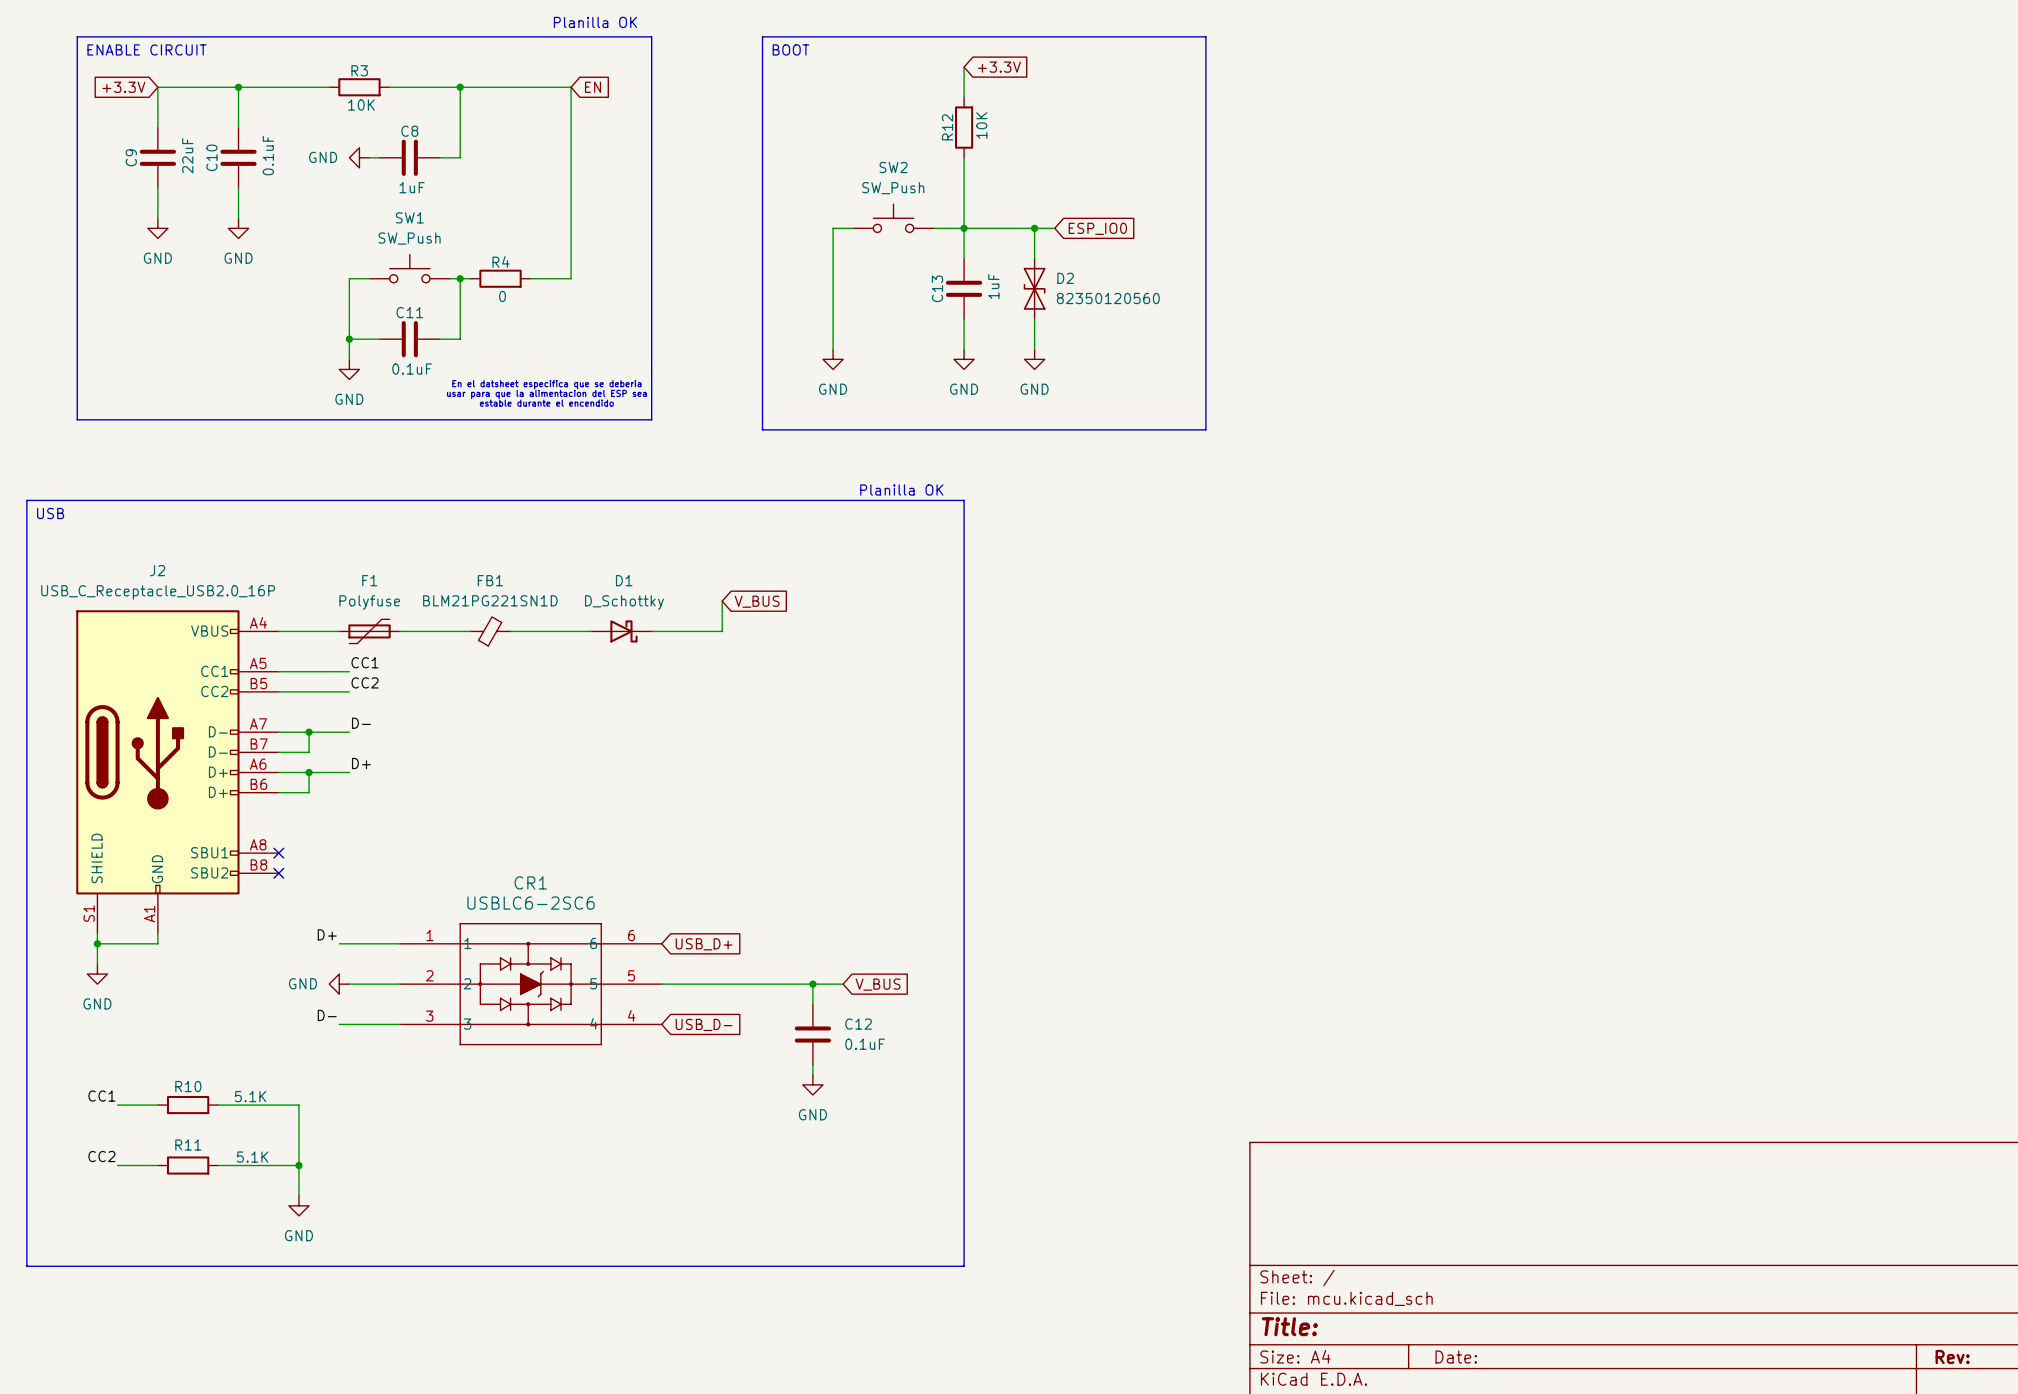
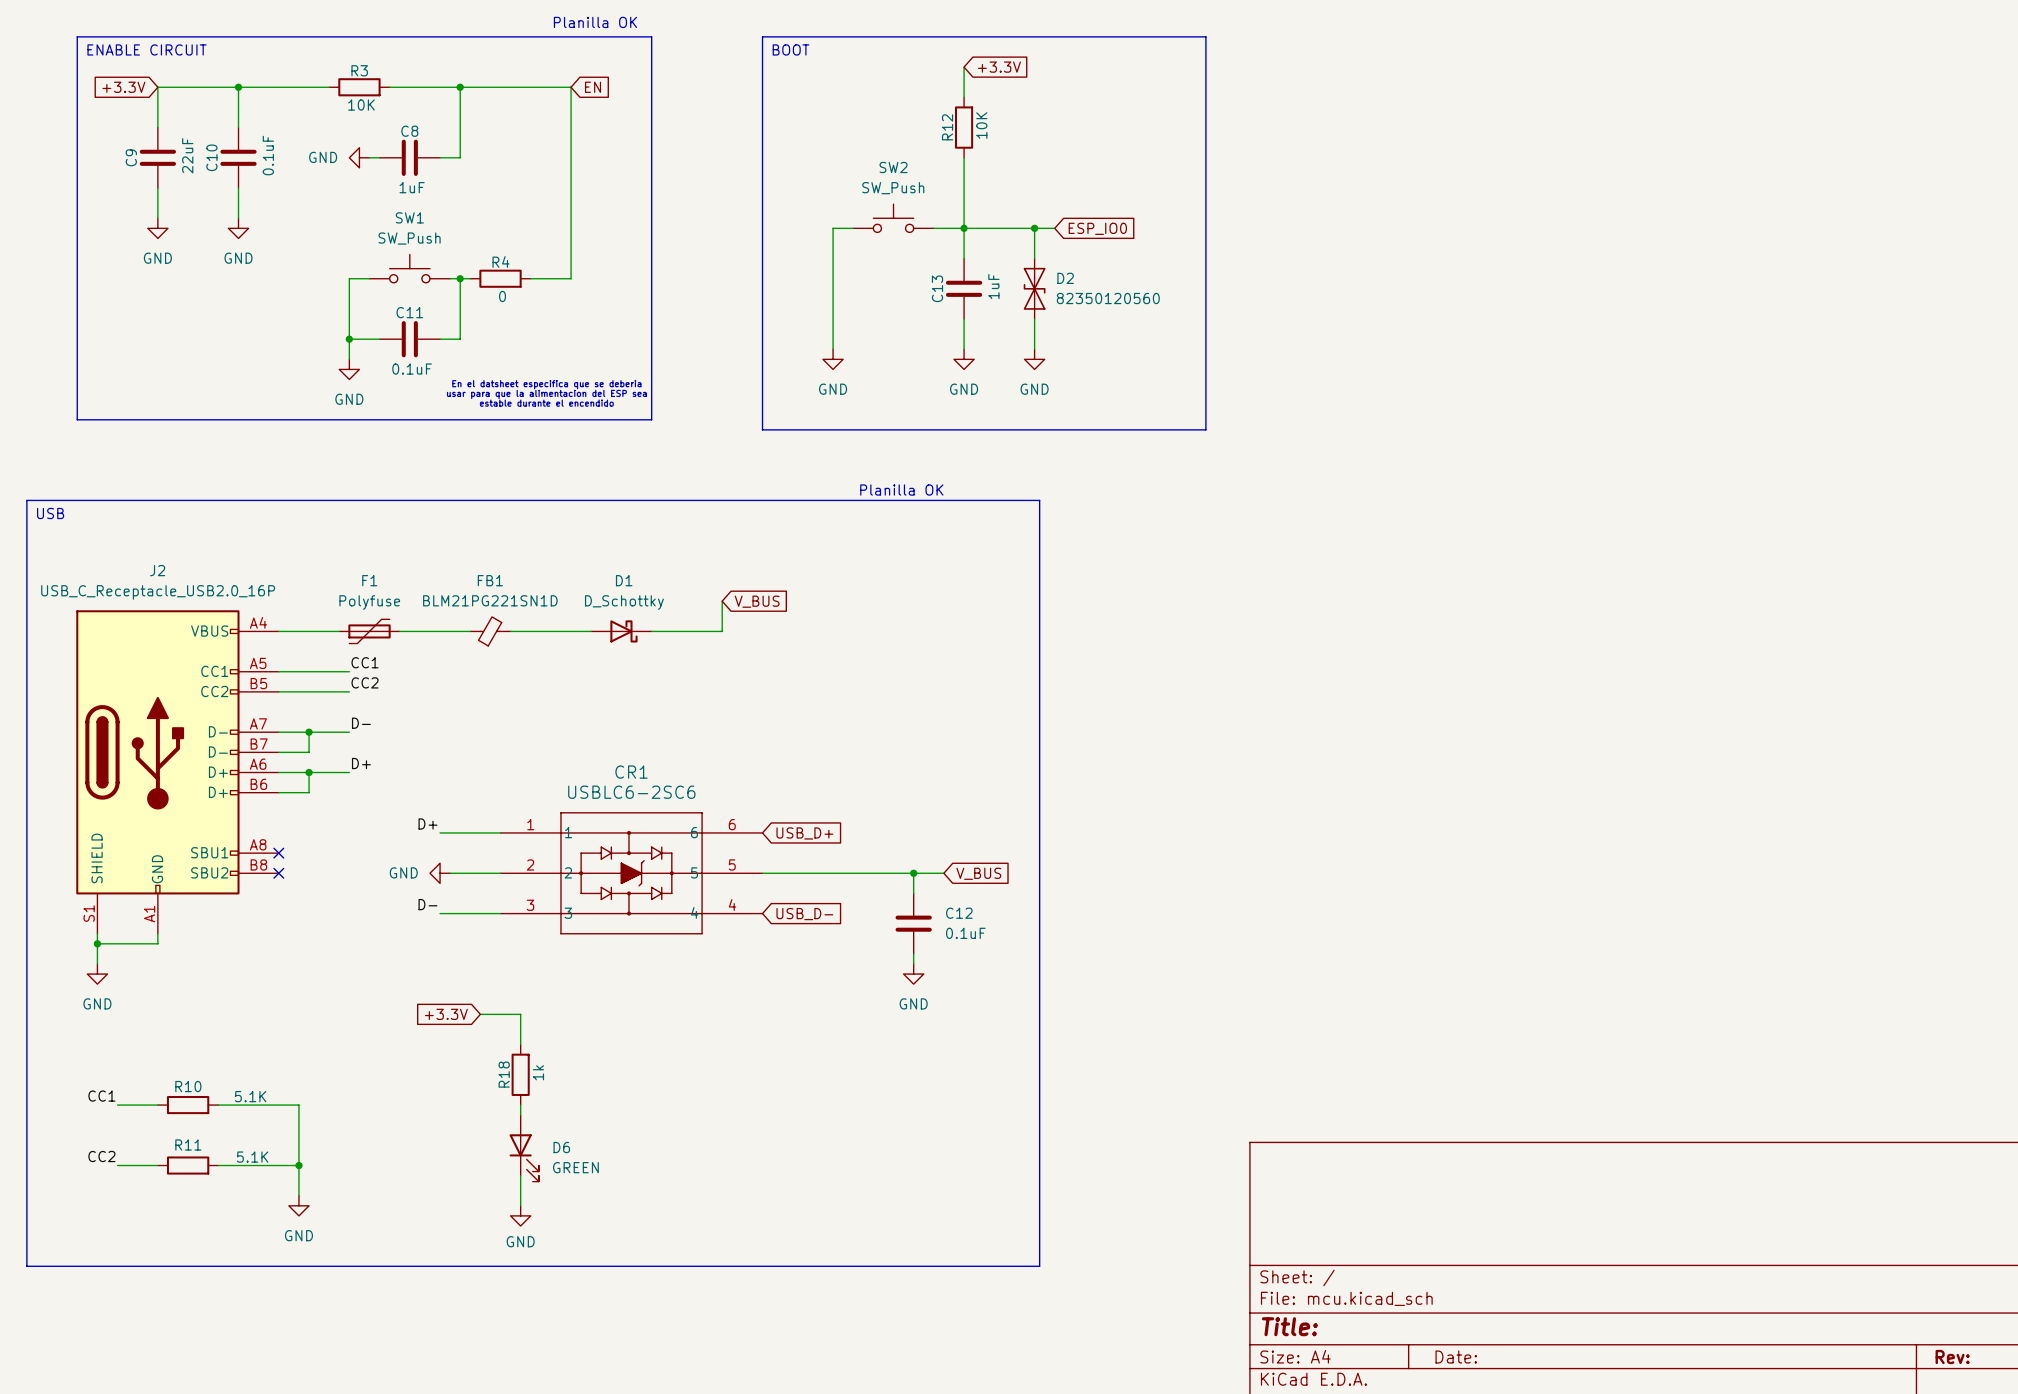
line: (964, 500) (964, 1266) -> (964, 500) (1039, 500) (1039, 1266) (964, 1266)
power symbol: none -> GND (440, 873)
junction: none -> (913, 873)
label position: D+ (327, 934) -> D+ (427, 823)
wire: (339, 943) (399, 943) -> (440, 832) (500, 832)
global label position: USB_D+ (704, 944) -> USB_D+ (804, 833)
power symbol: GND (339, 984) -> none
wire: (349, 984) (399, 984) -> (450, 873) (500, 873)
CR1 position: (530, 984) -> (631, 873)
wire: (661, 984) (843, 984) -> (762, 873) (943, 873)
wire: (812, 984) (812, 1004) -> (913, 873) (913, 893)
junction: (812, 984) -> none
global label position: V_BUS (878, 984) -> V_BUS (978, 873)
global label: none -> +3.3V (446, 1014)
wire: none -> (480, 1014) (520, 1014) (520, 1044)
label position: D- (327, 1015) -> D- (427, 904)
wire: (339, 1024) (399, 1024) -> (440, 913) (500, 913)
global label position: USB_D- (704, 1024) -> USB_D- (804, 914)
C12 position: (812, 1034) -> (913, 923)
wire: (812, 1064) (812, 1074) -> (913, 953) (913, 963)
R18: none -> 1k (520, 1074)
power symbol position: GND (812, 1084) -> GND (913, 974)
wire: none -> (520, 1105) (520, 1115)
D6: none -> GREEN (524, 1148)
wire: none -> (520, 1175) (520, 1205)
power symbol: none -> GND (520, 1215)

